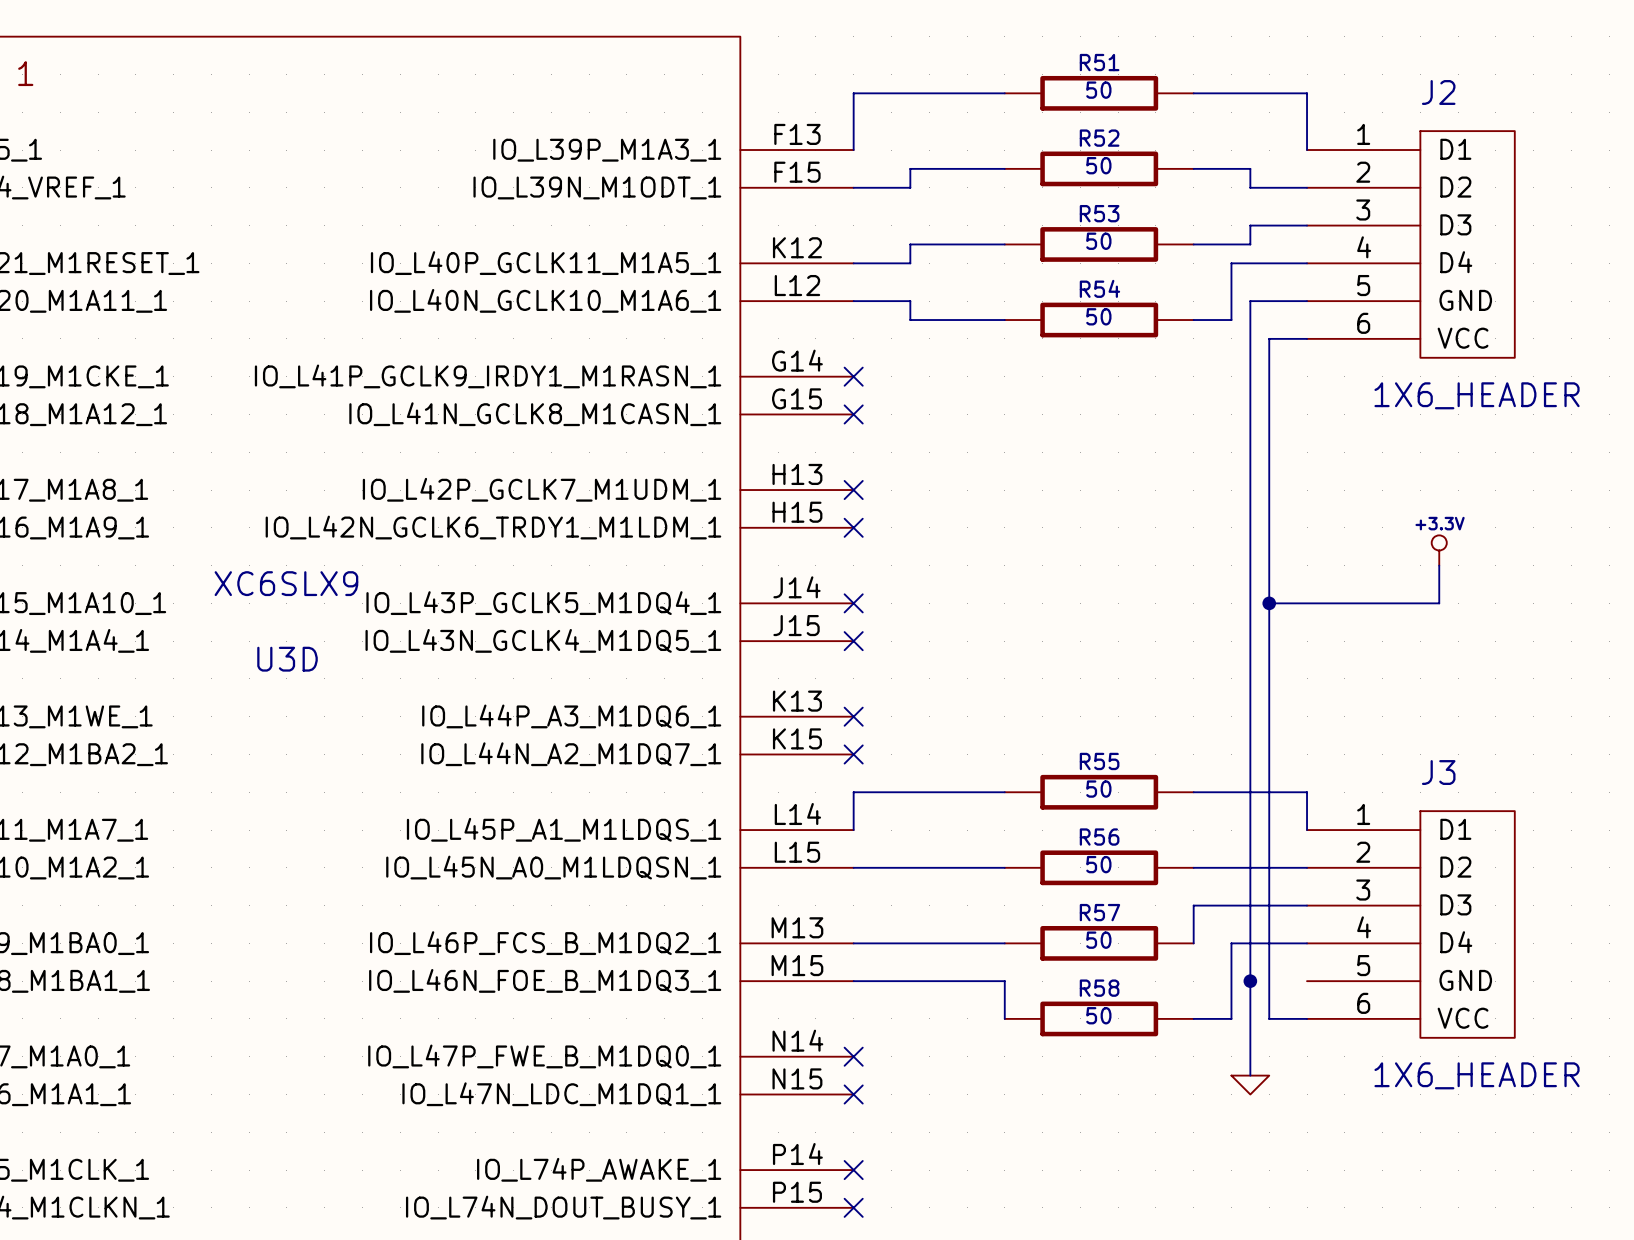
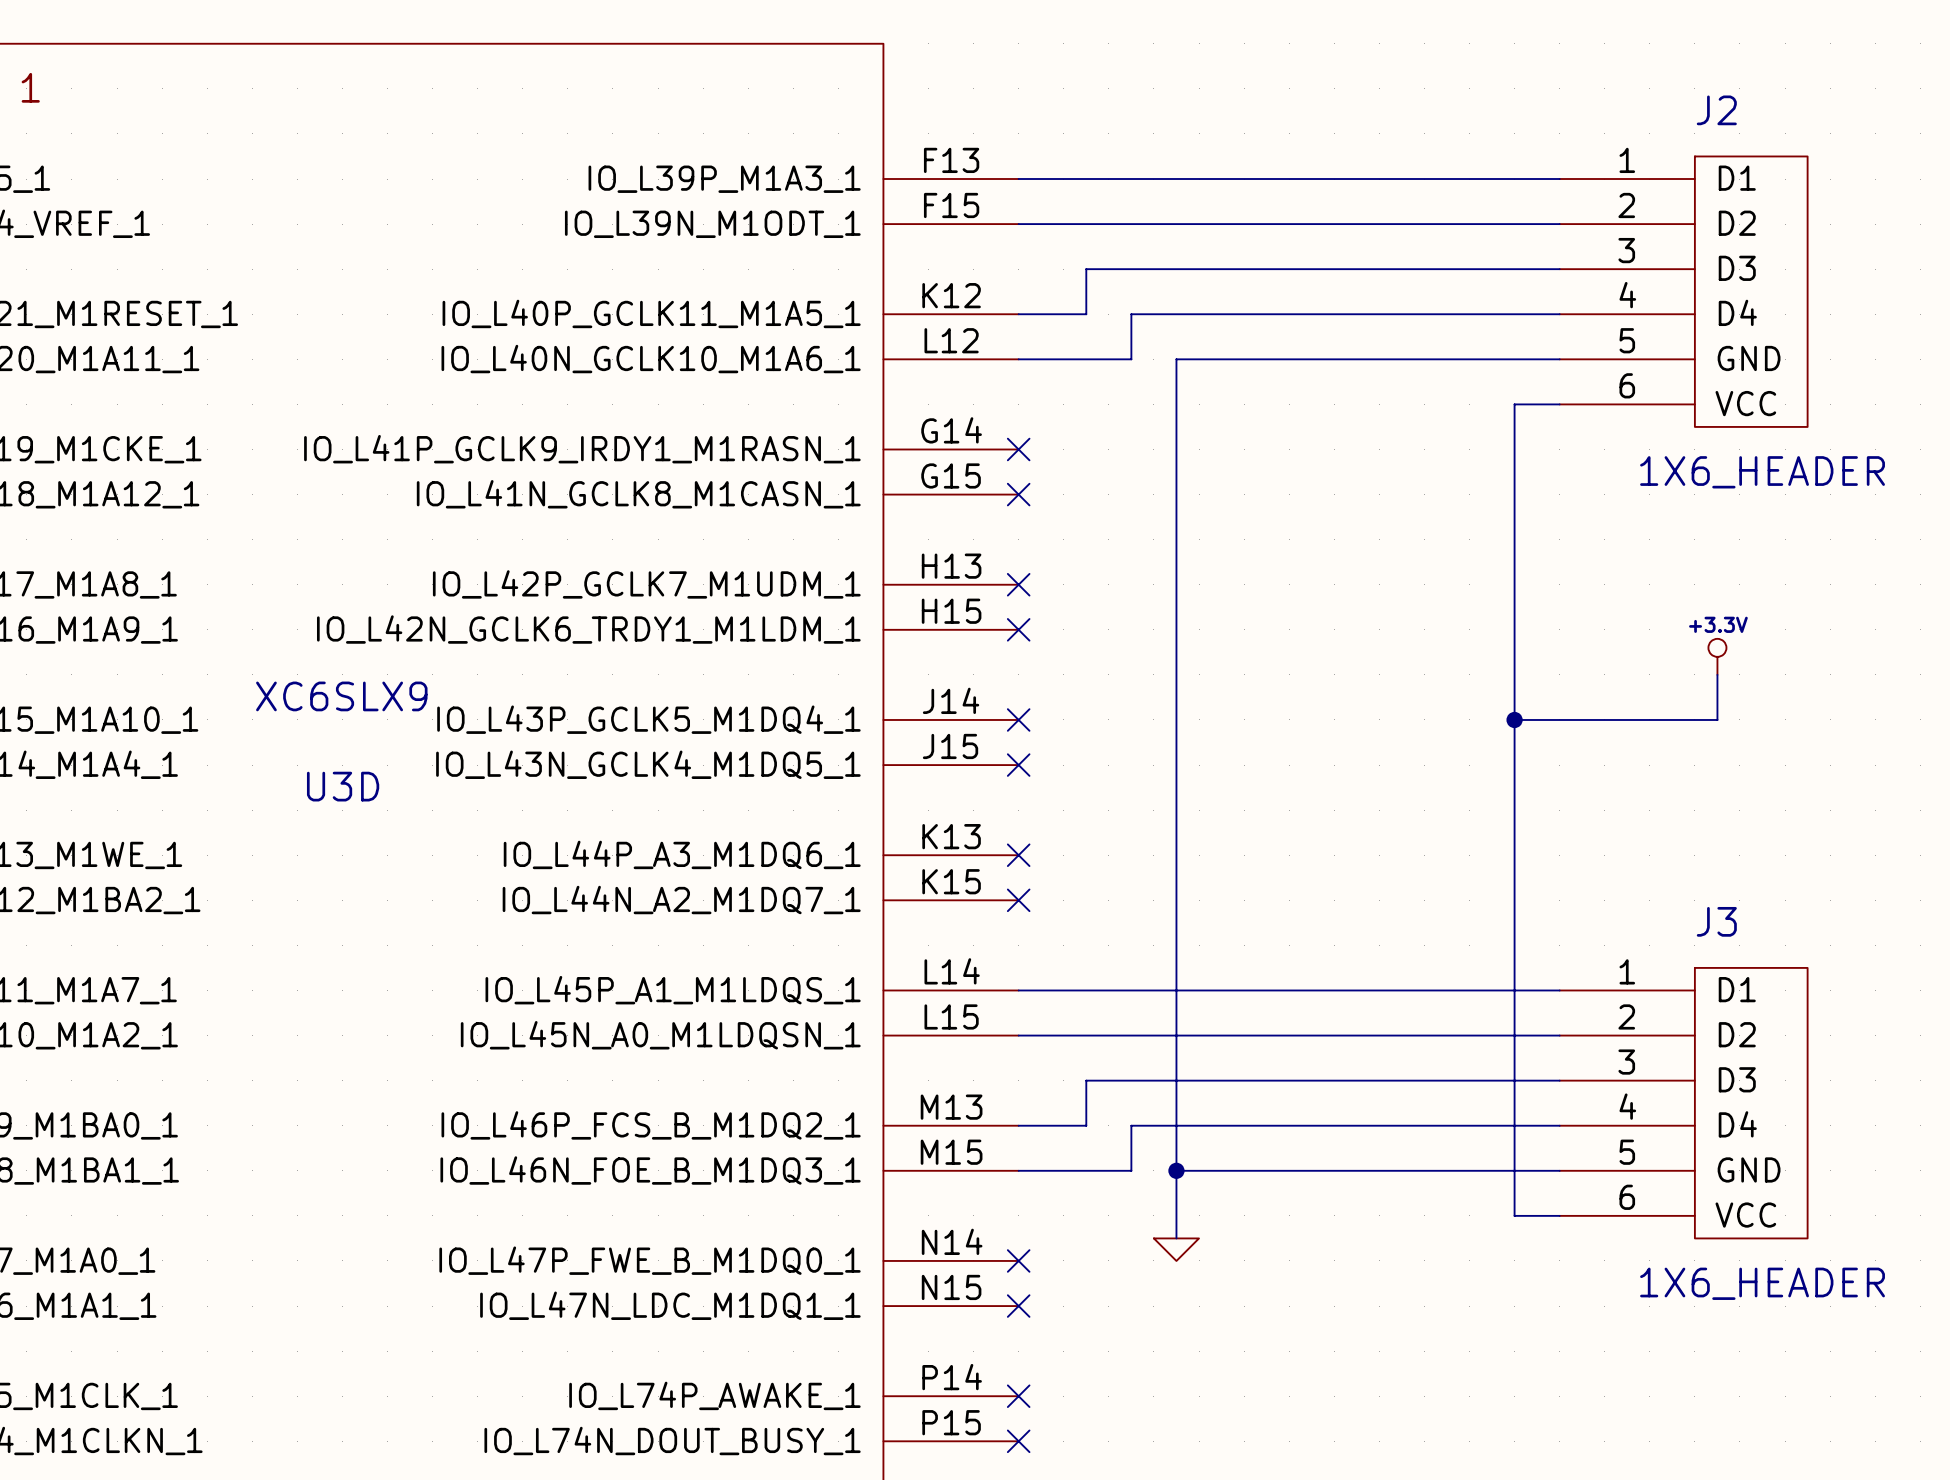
wire: (1004, 93) (853, 93) (853, 150) -> (1559, 179) (1018, 179)
R51: 50 (1099, 93) -> none
wire: (1193, 93) (1307, 93) (1307, 150) -> none
wire: (1004, 168) (910, 168) (910, 187) -> (1492, 224) (1086, 224)
R52: 50 (1099, 168) -> none
wire: (1193, 168) (1250, 168) (1250, 187) -> none
wire: (1250, 225) (1250, 244) (1193, 244) -> none
wire: (910, 244) (1004, 244) -> (1086, 291) (1086, 269) (1492, 269)
R53: 50 (1099, 244) -> none
wire: (1231, 263) (1231, 320) (1193, 320) -> none
wire: (910, 301) (910, 320) (1004, 320) -> (1086, 359) (1131, 359) (1131, 314) (1469, 314)
wire: (1250, 301) (1250, 1075) -> (1492, 359) (1176, 359) (1176, 1238)
R54: 50 (1099, 320) -> none
wire: (1004, 792) (853, 792) (853, 830) -> (1559, 990) (1018, 990)
R55: 50 (1099, 792) -> none
wire: (1193, 792) (1307, 792) (1307, 830) -> none
wire: none -> (1199, 1035) (1424, 1035)
R56: 50 (1099, 867) -> none
wire: (1193, 905) (1193, 943) -> none
wire: (910, 943) (948, 943) -> (1086, 1125) (1086, 1080) (1424, 1080)
R57: 50 (1099, 943) -> none
wire: (1231, 943) (1231, 1018) (1193, 1018) -> (1469, 1125) (1199, 1125)
wire: (948, 981) (985, 981) -> (1131, 1170) (1131, 1125)
junction: none -> (1176, 1170)
wire: (1004, 981) (1004, 1018) -> (1199, 1170) (1559, 1170)
junction: (1250, 981) -> none
R58: 50 (1099, 1018) -> none
power symbol position: (1250, 1085) -> (1176, 1249)

